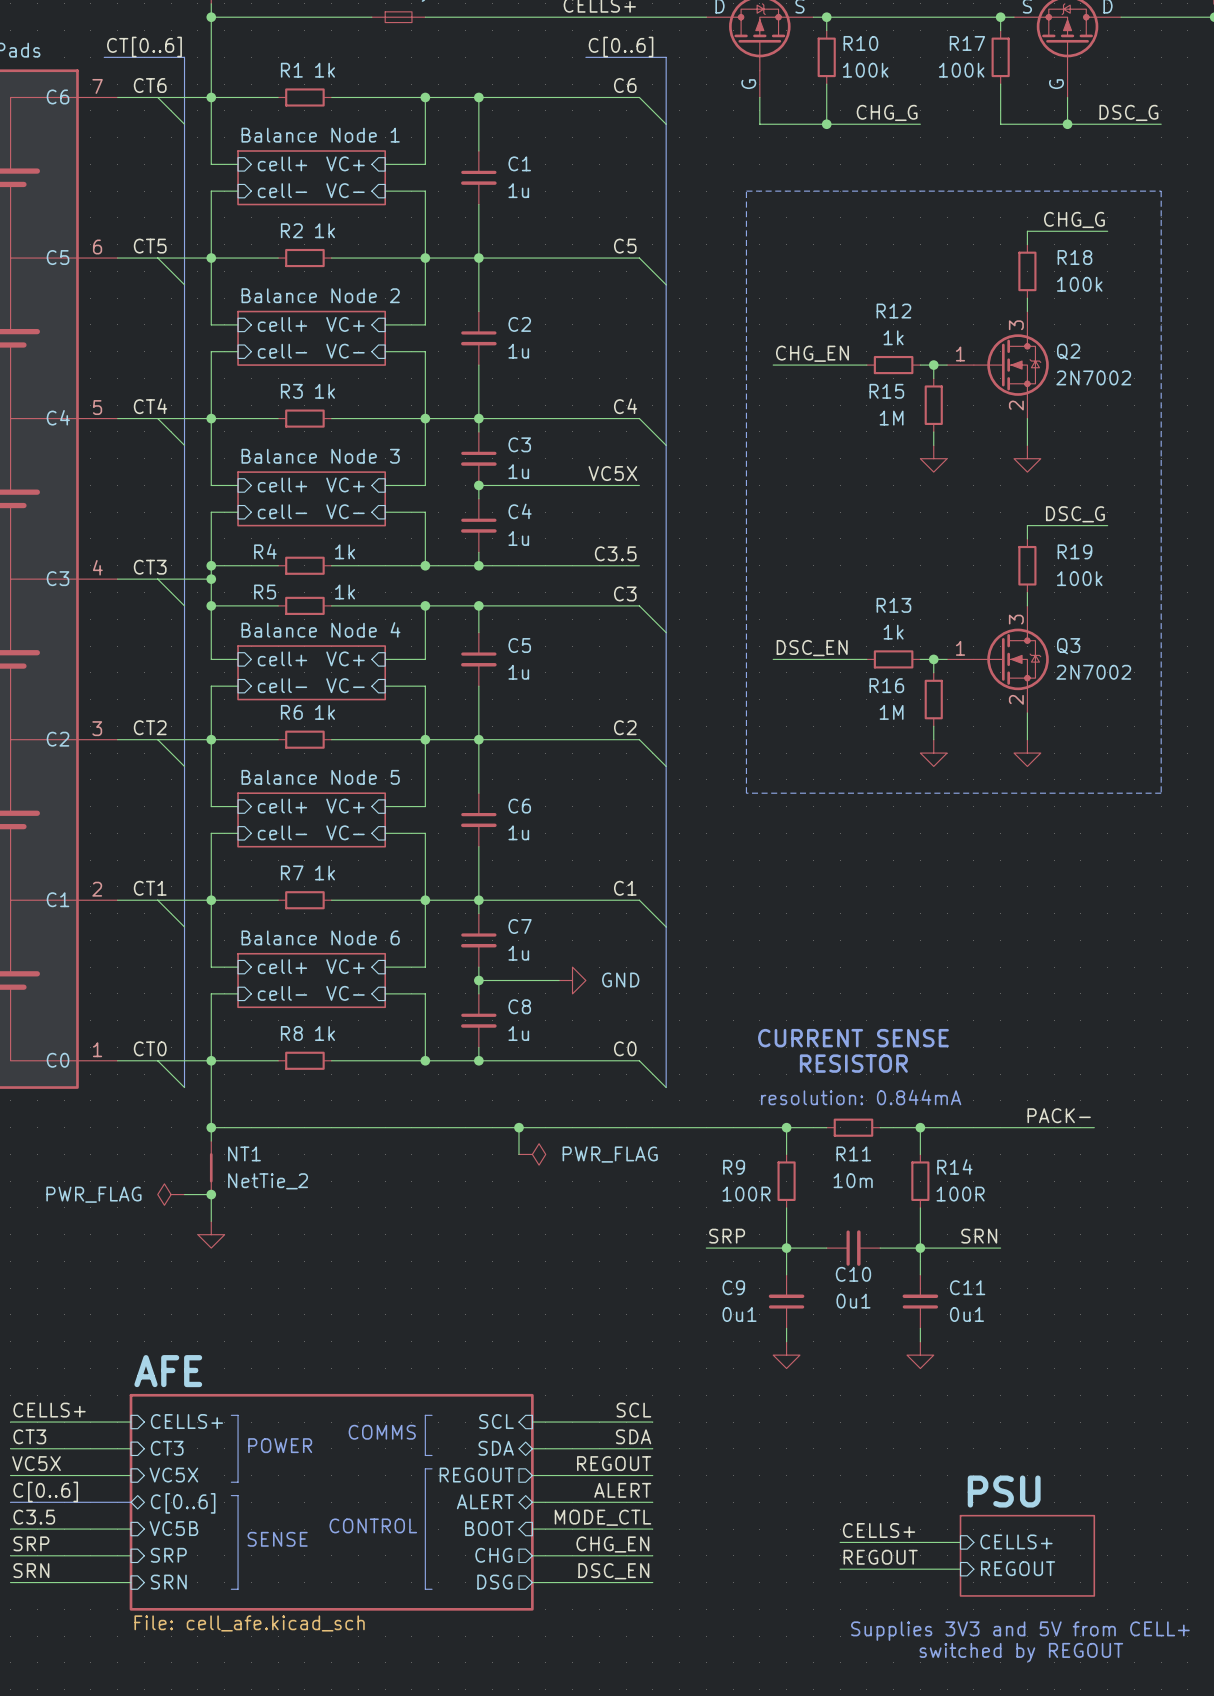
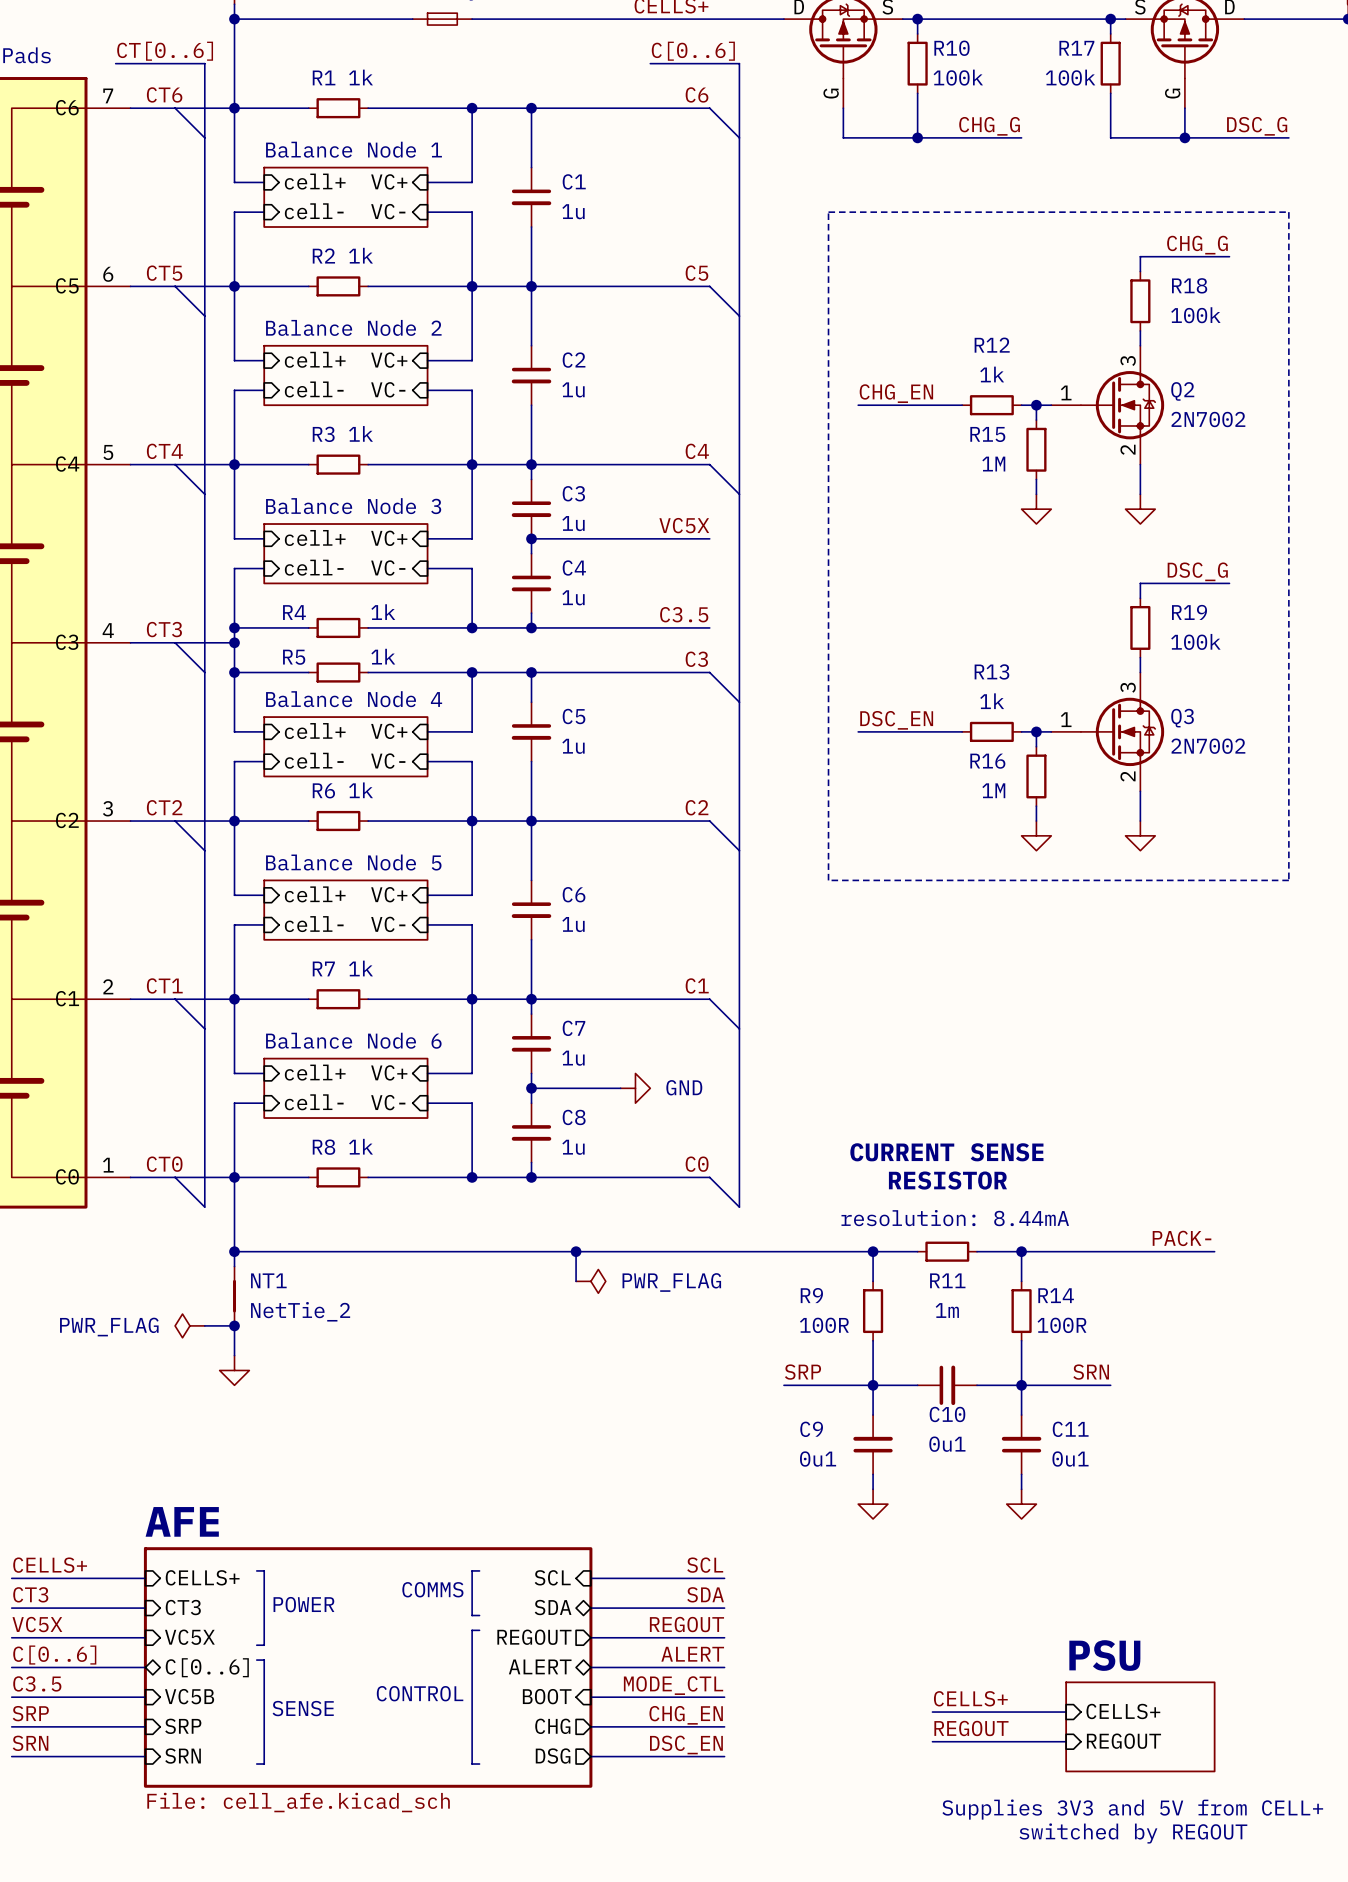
text: resolution: 0.844mA (861, 1097) -> resolution: 8.44mA (955, 1218)
R11 value: 10m (853, 1180) -> 1m (947, 1310)

